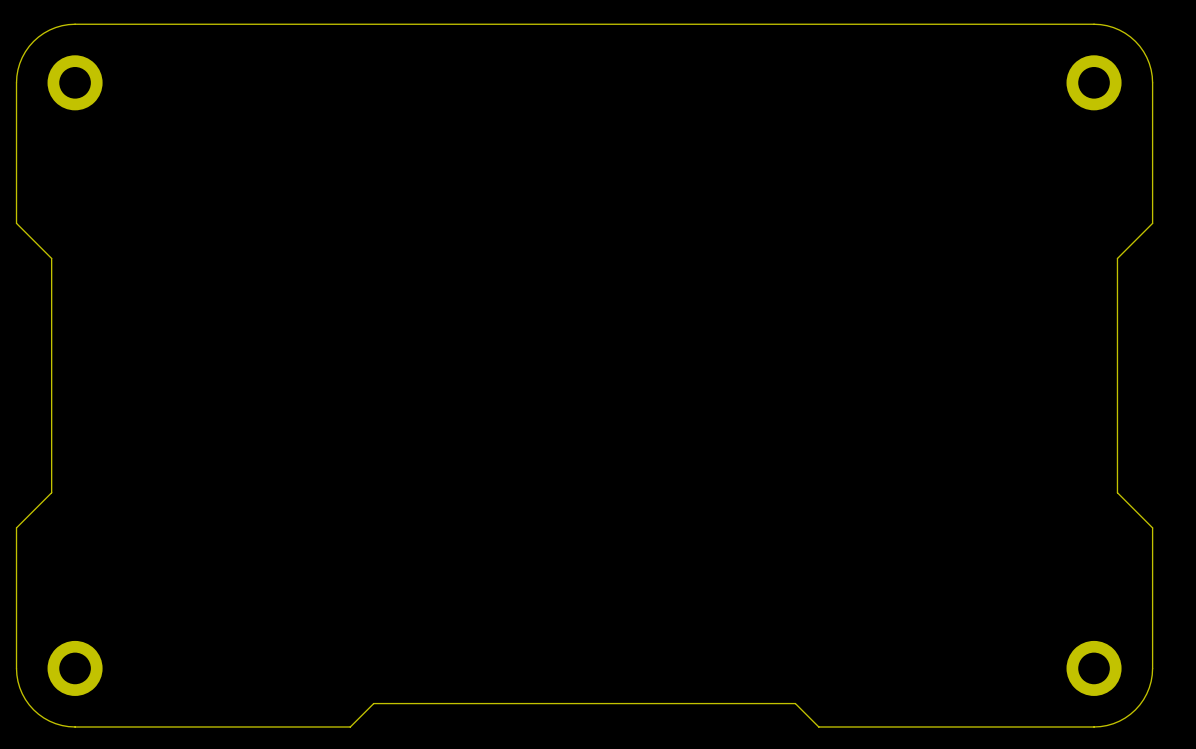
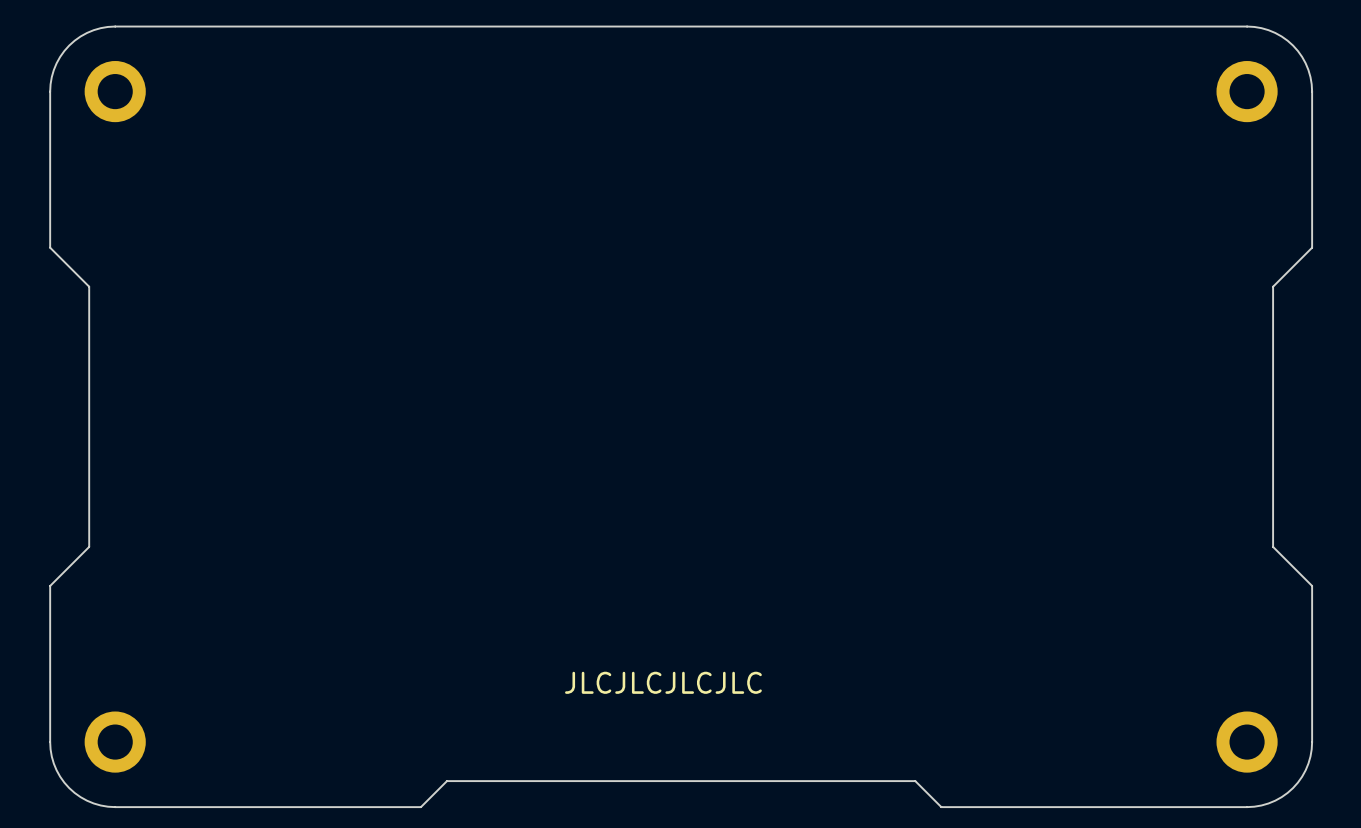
text: none -> JLCJLCJLCJLC (663, 682)

